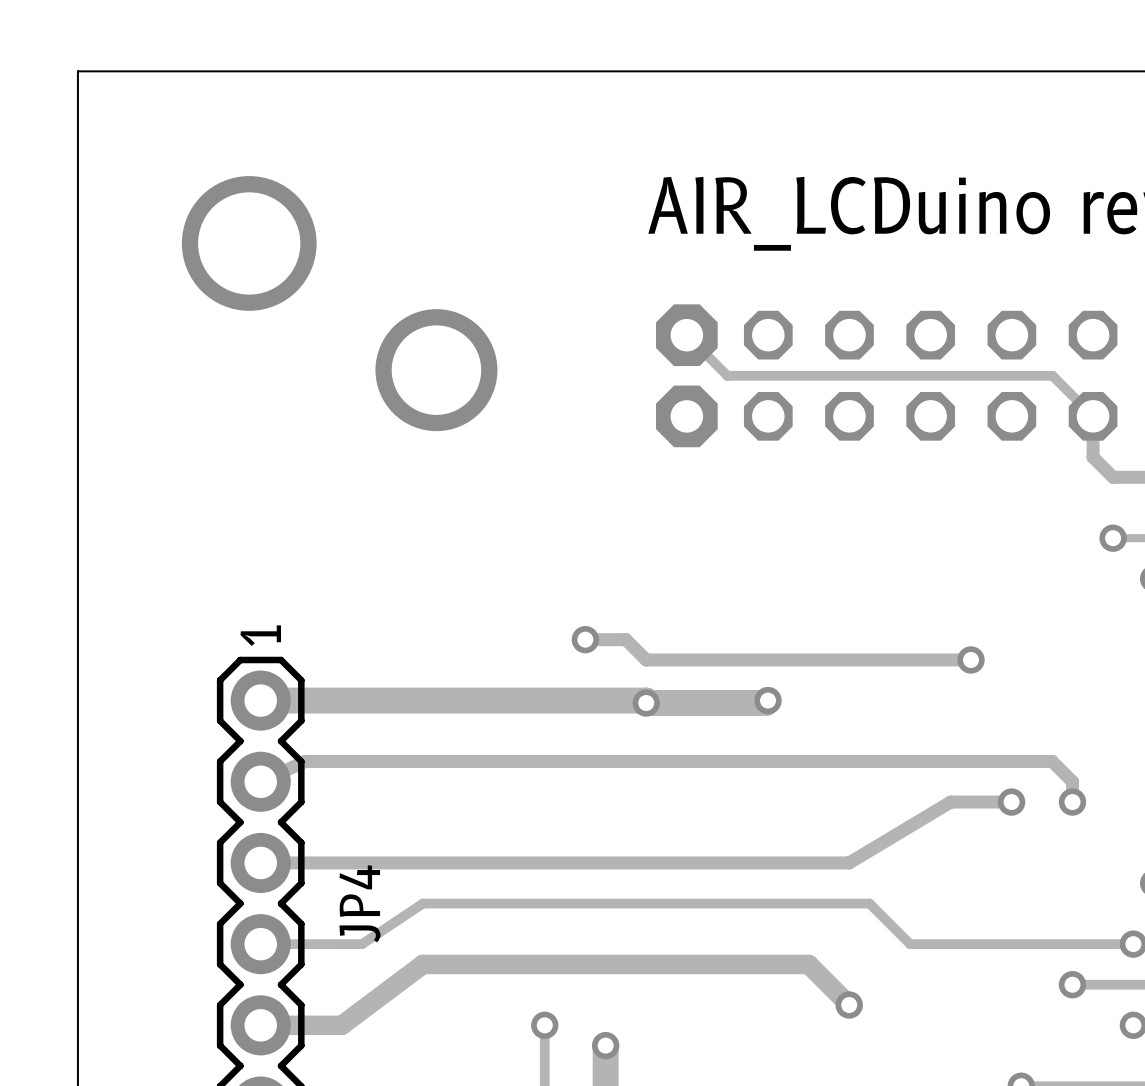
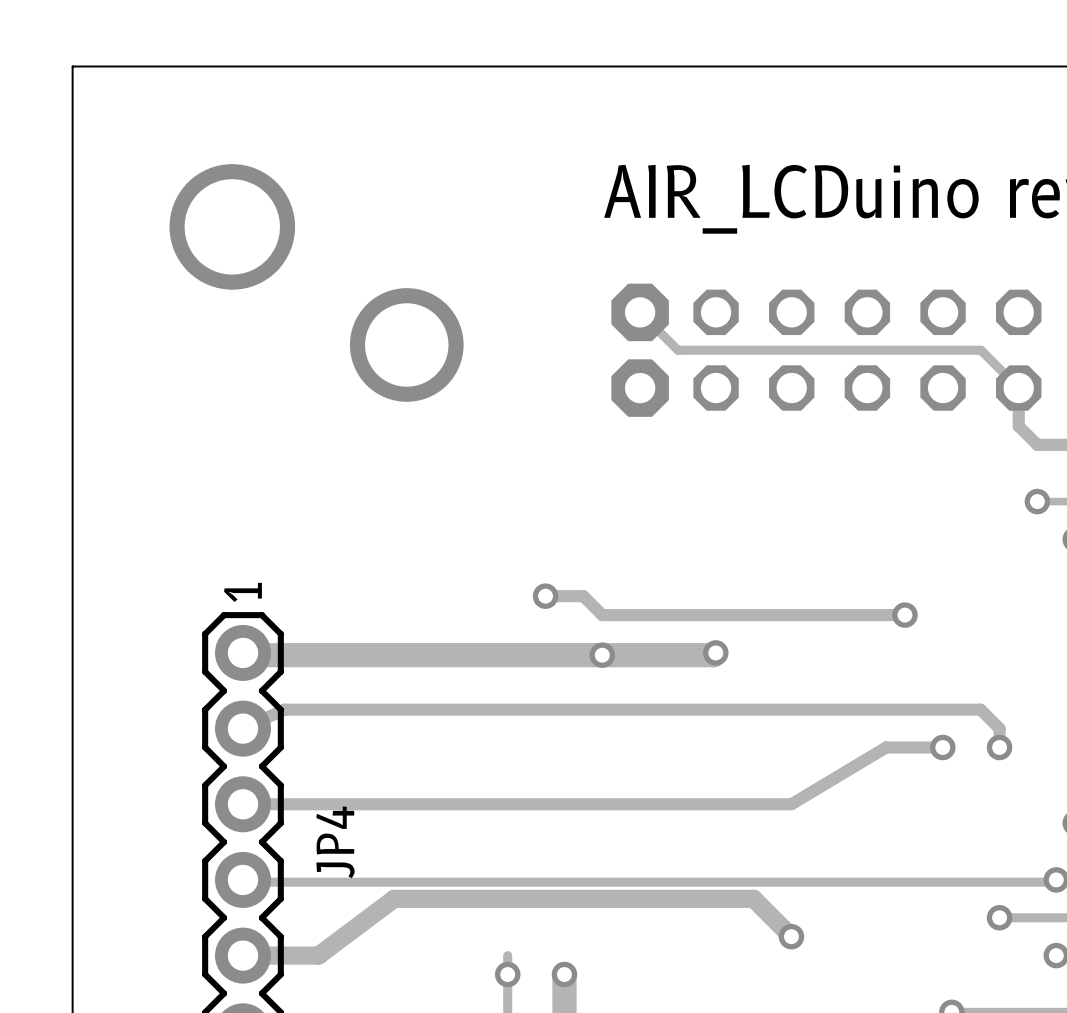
track: (260, 700) (646, 700) (646, 703) -> (263, 655) (602, 655)
track: (1133, 944) (910, 944) (869, 903) (422, 903) (362, 944) (260, 944) -> (1056, 879) (1054, 882) (263, 882)
via position: (544, 1025) -> (507, 974)

